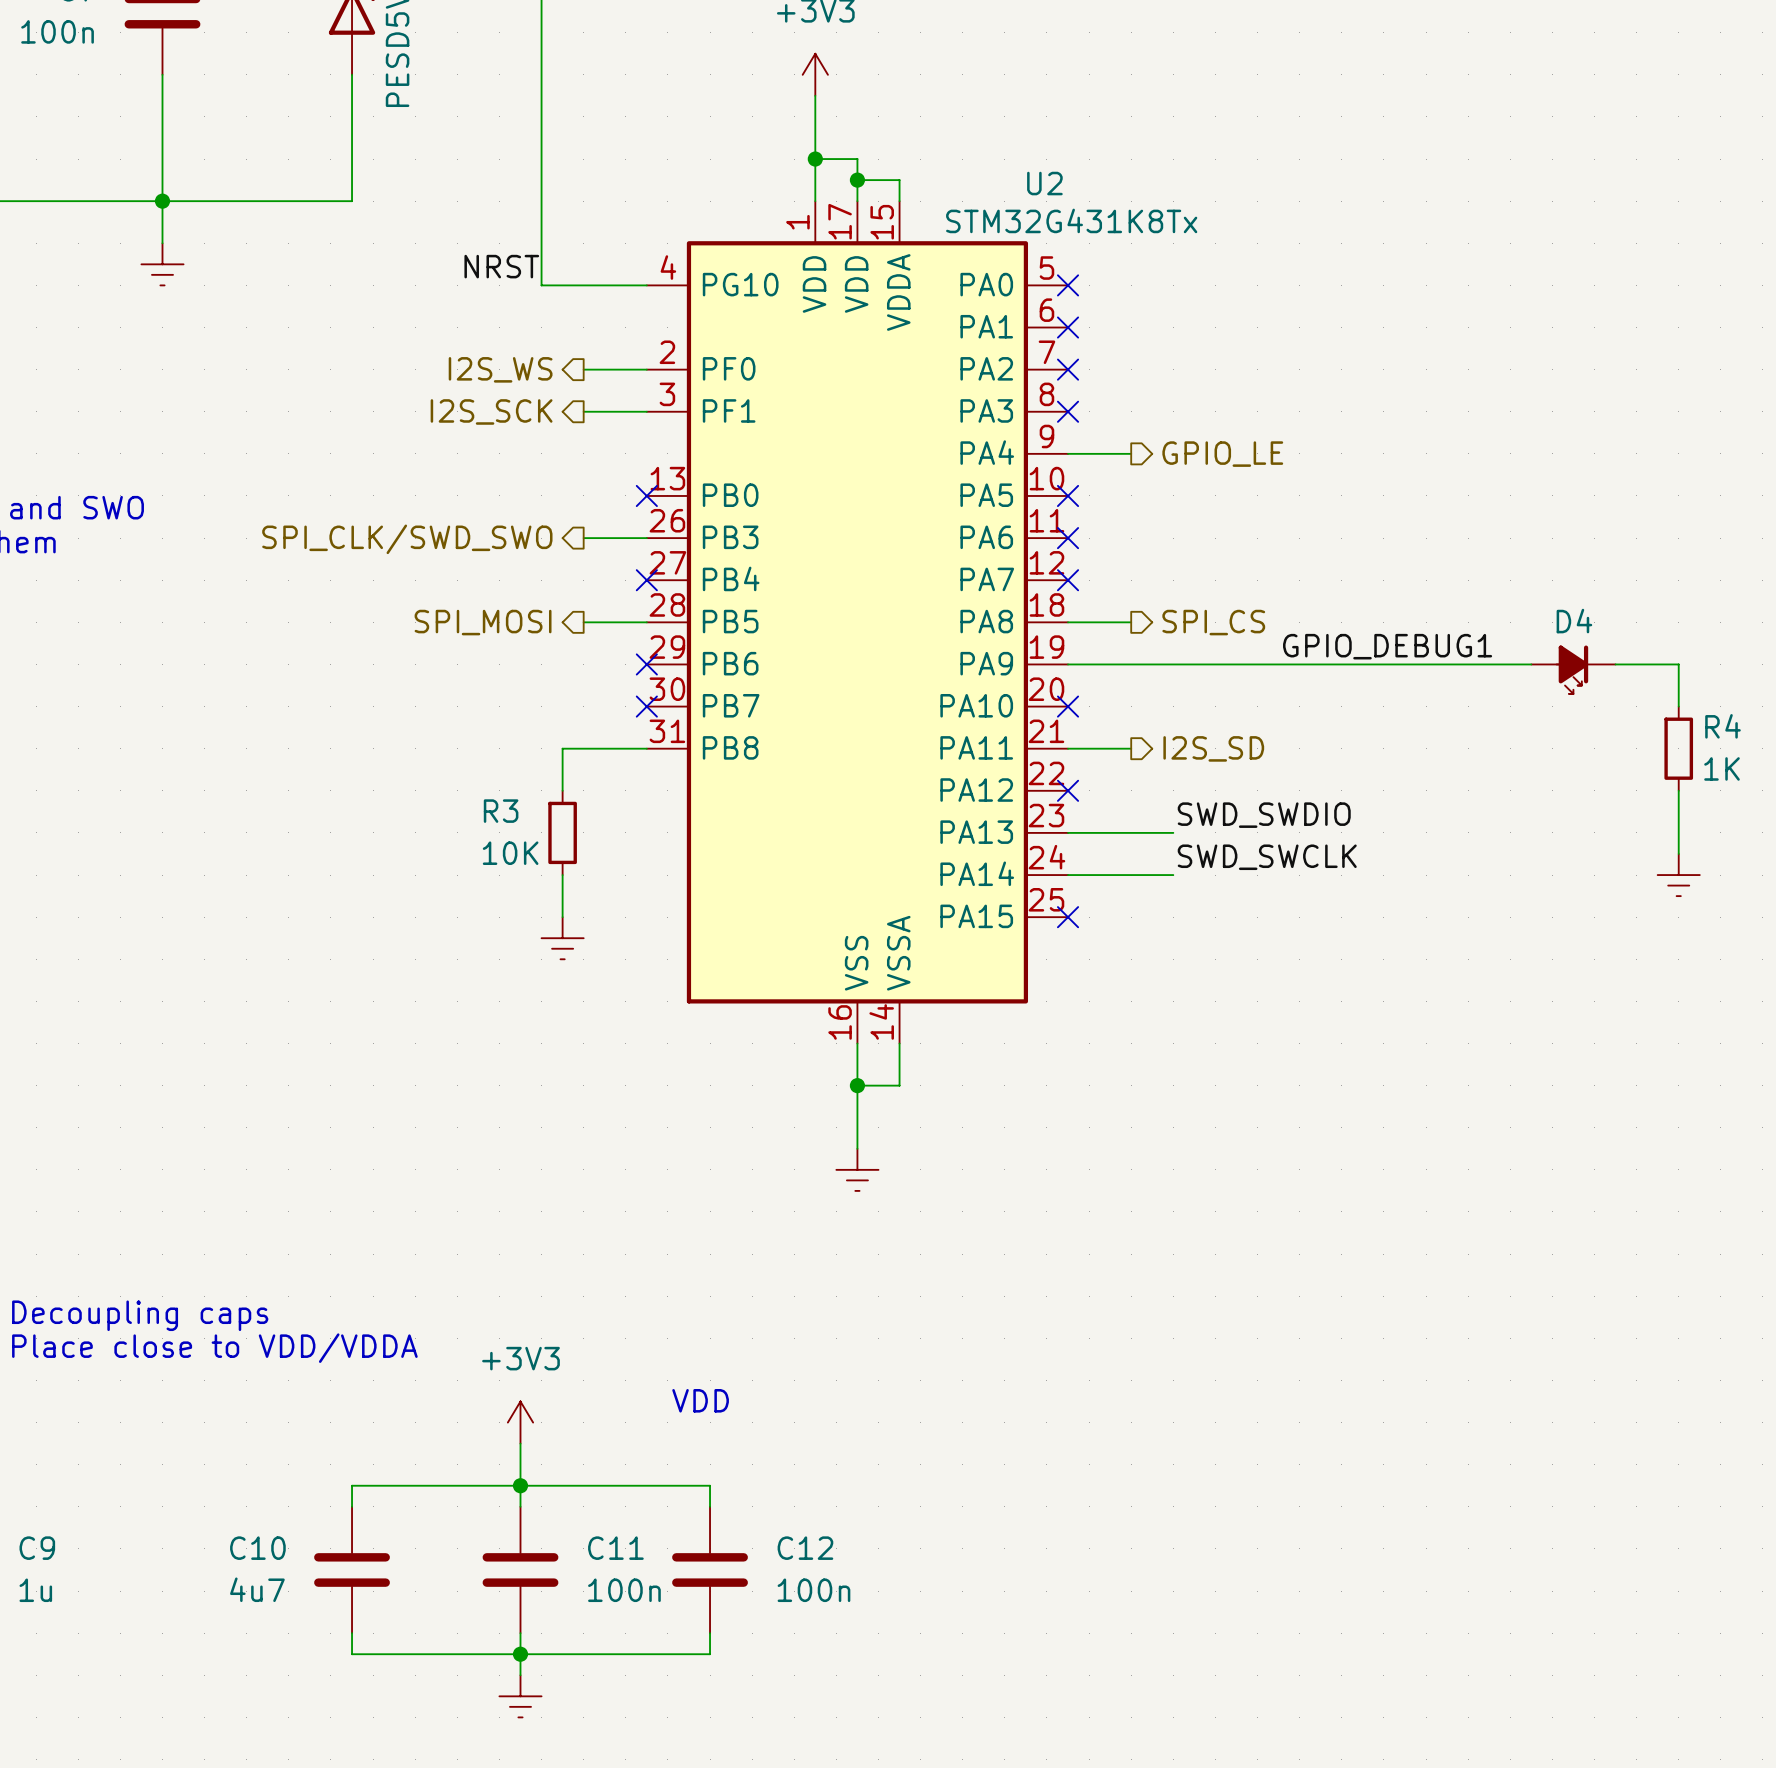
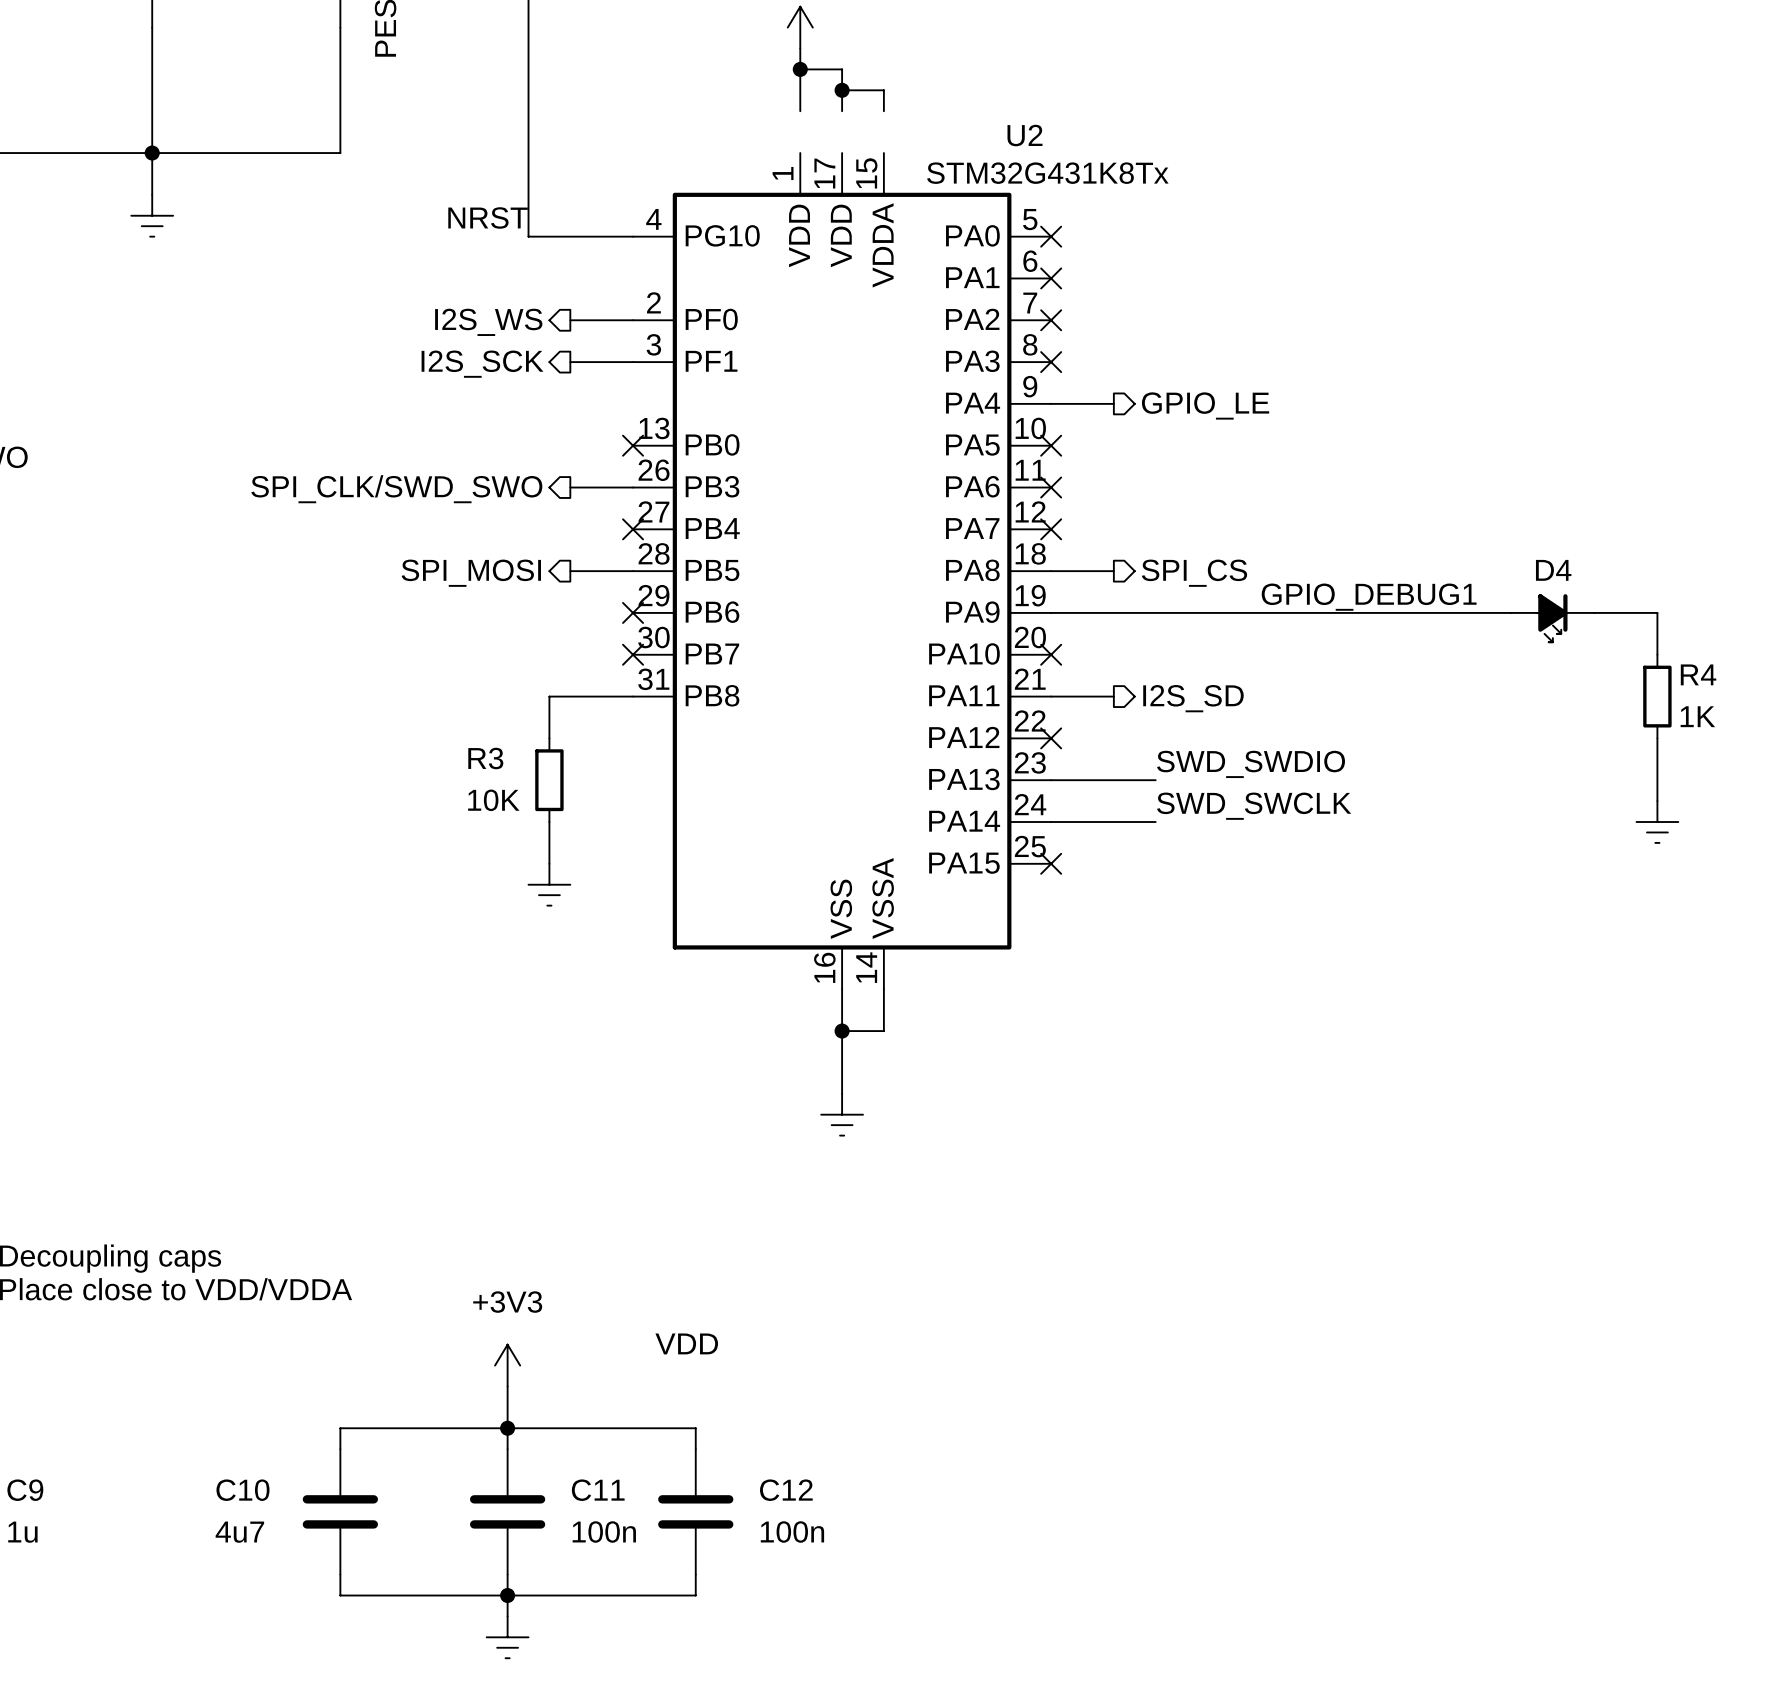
wire: none -> (800, 69) (842, 69) (842, 111)
junction: none -> (800, 69)
junction: none -> (842, 90)
junction: (815, 159) -> none
wire: (857, 180) (899, 180) (899, 201) -> (842, 90) (883, 90) (883, 111)
junction: (857, 180) -> none
wire: (815, 201) (815, 159) (857, 159) (857, 201) -> none

